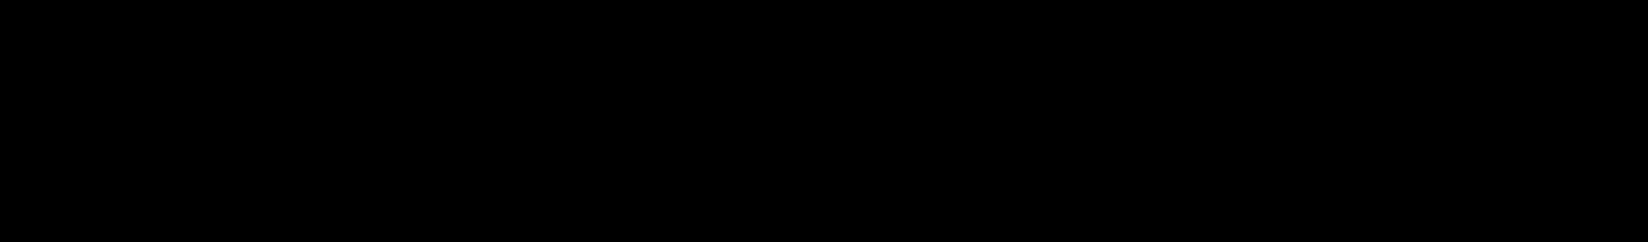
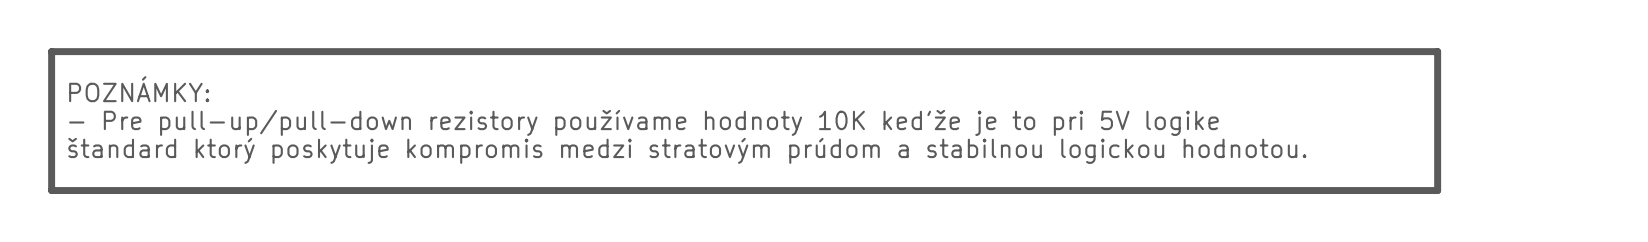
line: none -> (51, 51) (1437, 51) (1437, 190) (51, 190) (51, 51)
text: none -> POZNÁMKY: (139, 89)
text: none -> - Pre pull-up/pull-down rezistory používame hodnoty 10K keďže je to pri 5V logike (643, 122)
text: none -> štandard ktorý poskytuje kompromis medzi stratovým prúdom a stabilnou logickou hodnotou. (687, 150)

